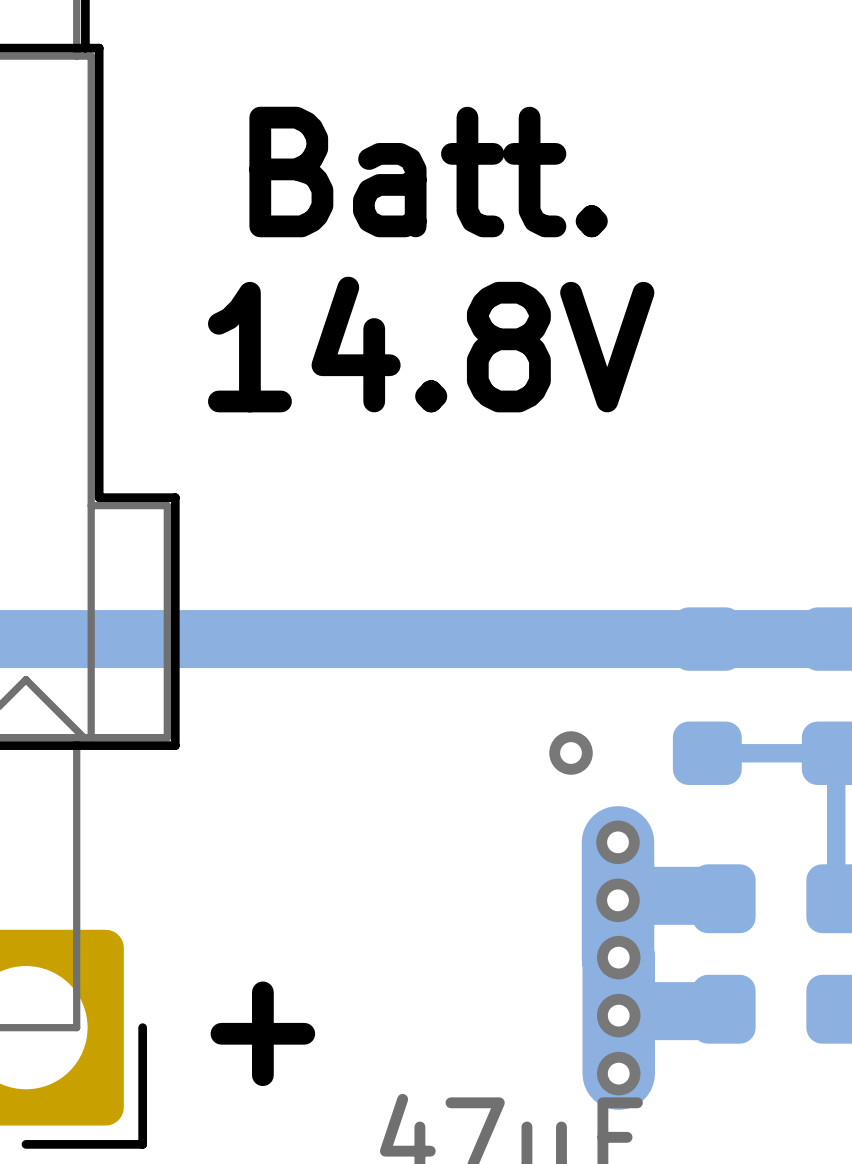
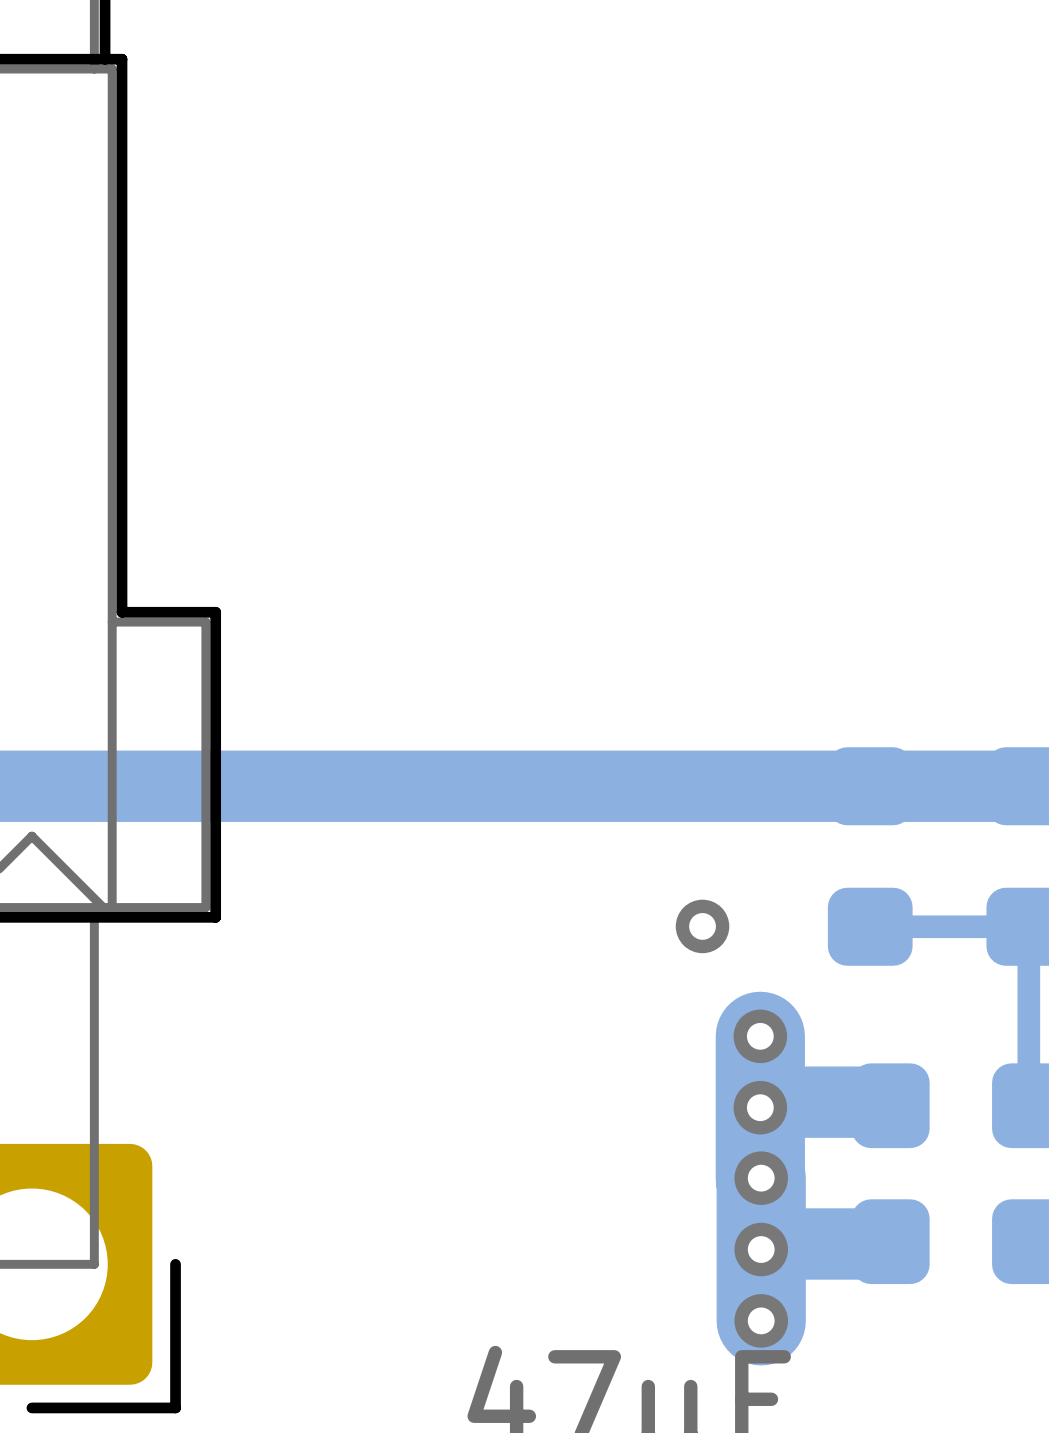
text: Batt. (428, 172) -> none
text: 14.8V (431, 344) -> none
text: + (262, 1033) -> none

